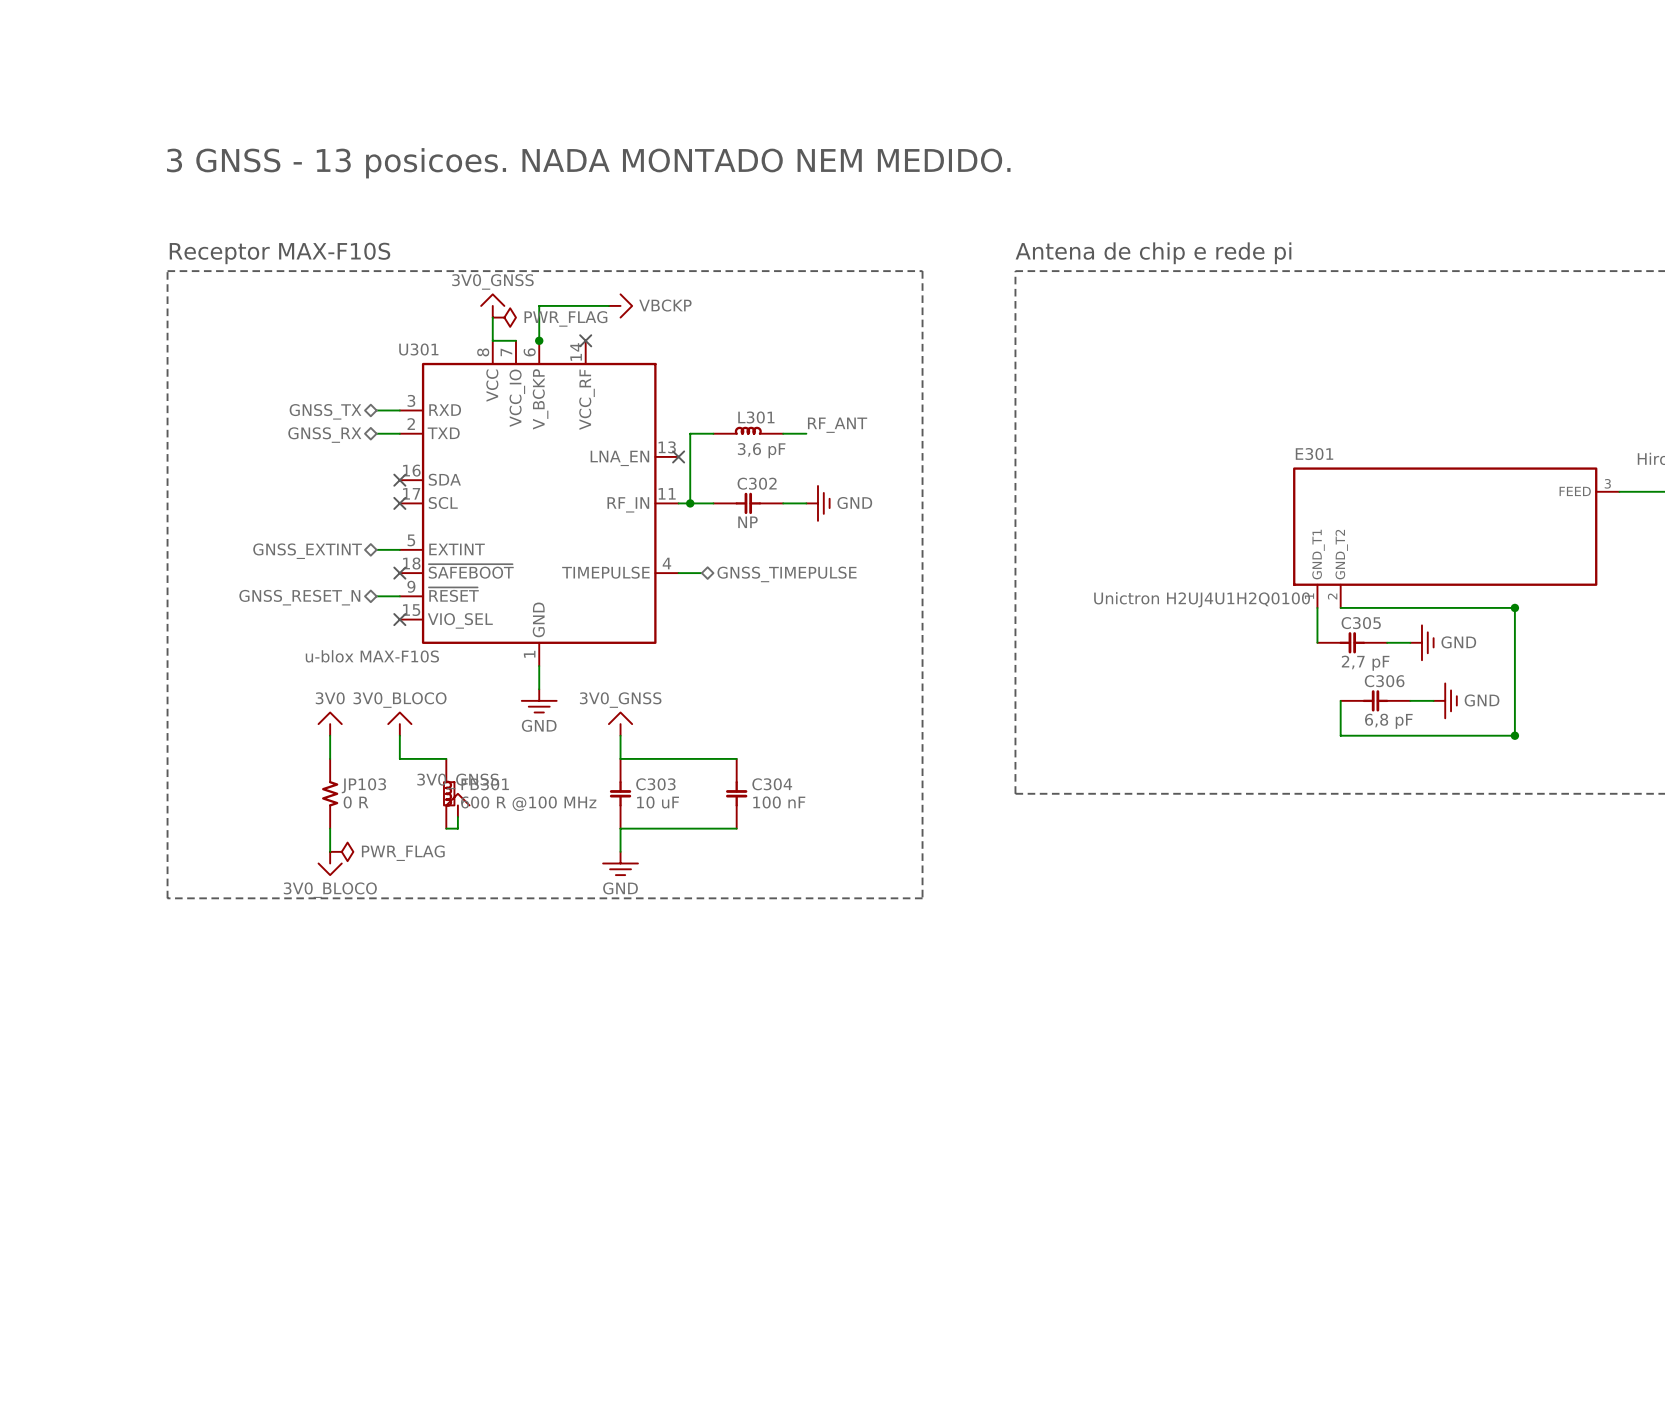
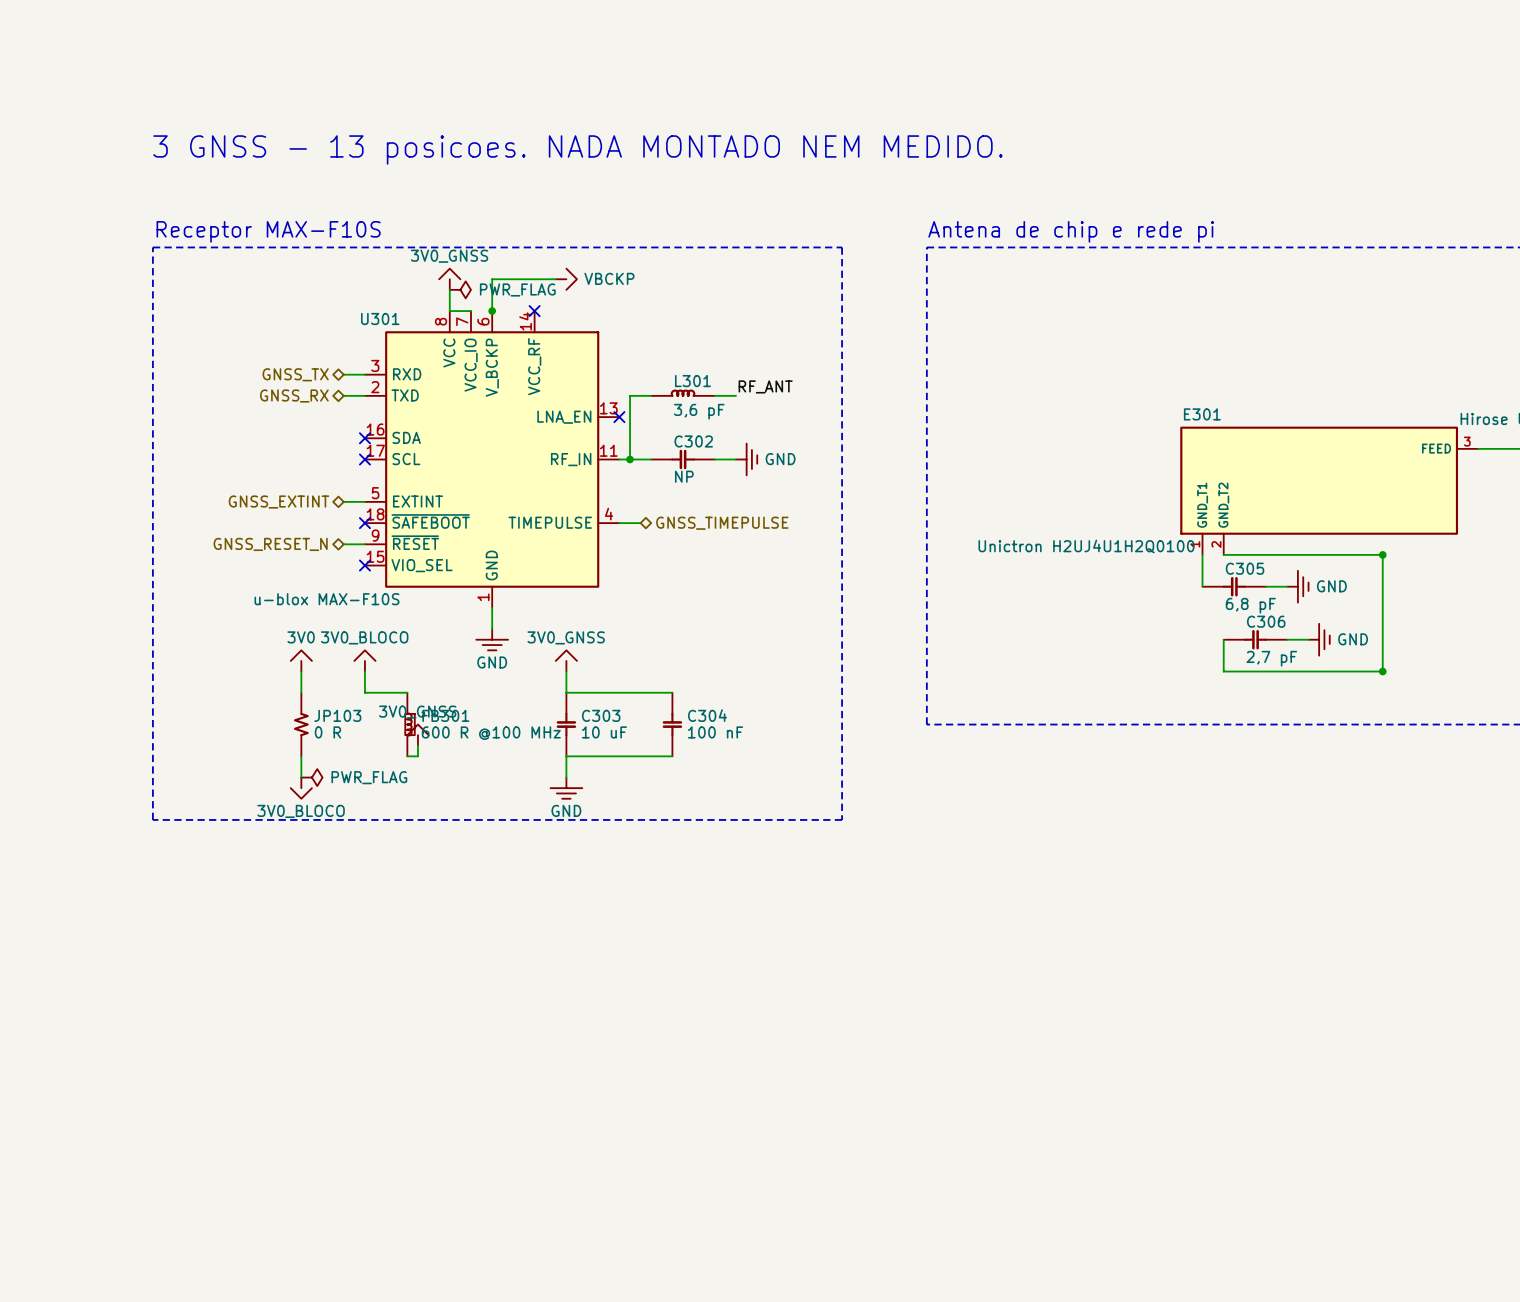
C305 value: 2,7 pF (1365, 663) -> 6,8 pF (1250, 605)
C306 value: 6,8 pF (1388, 721) -> 2,7 pF (1271, 658)

